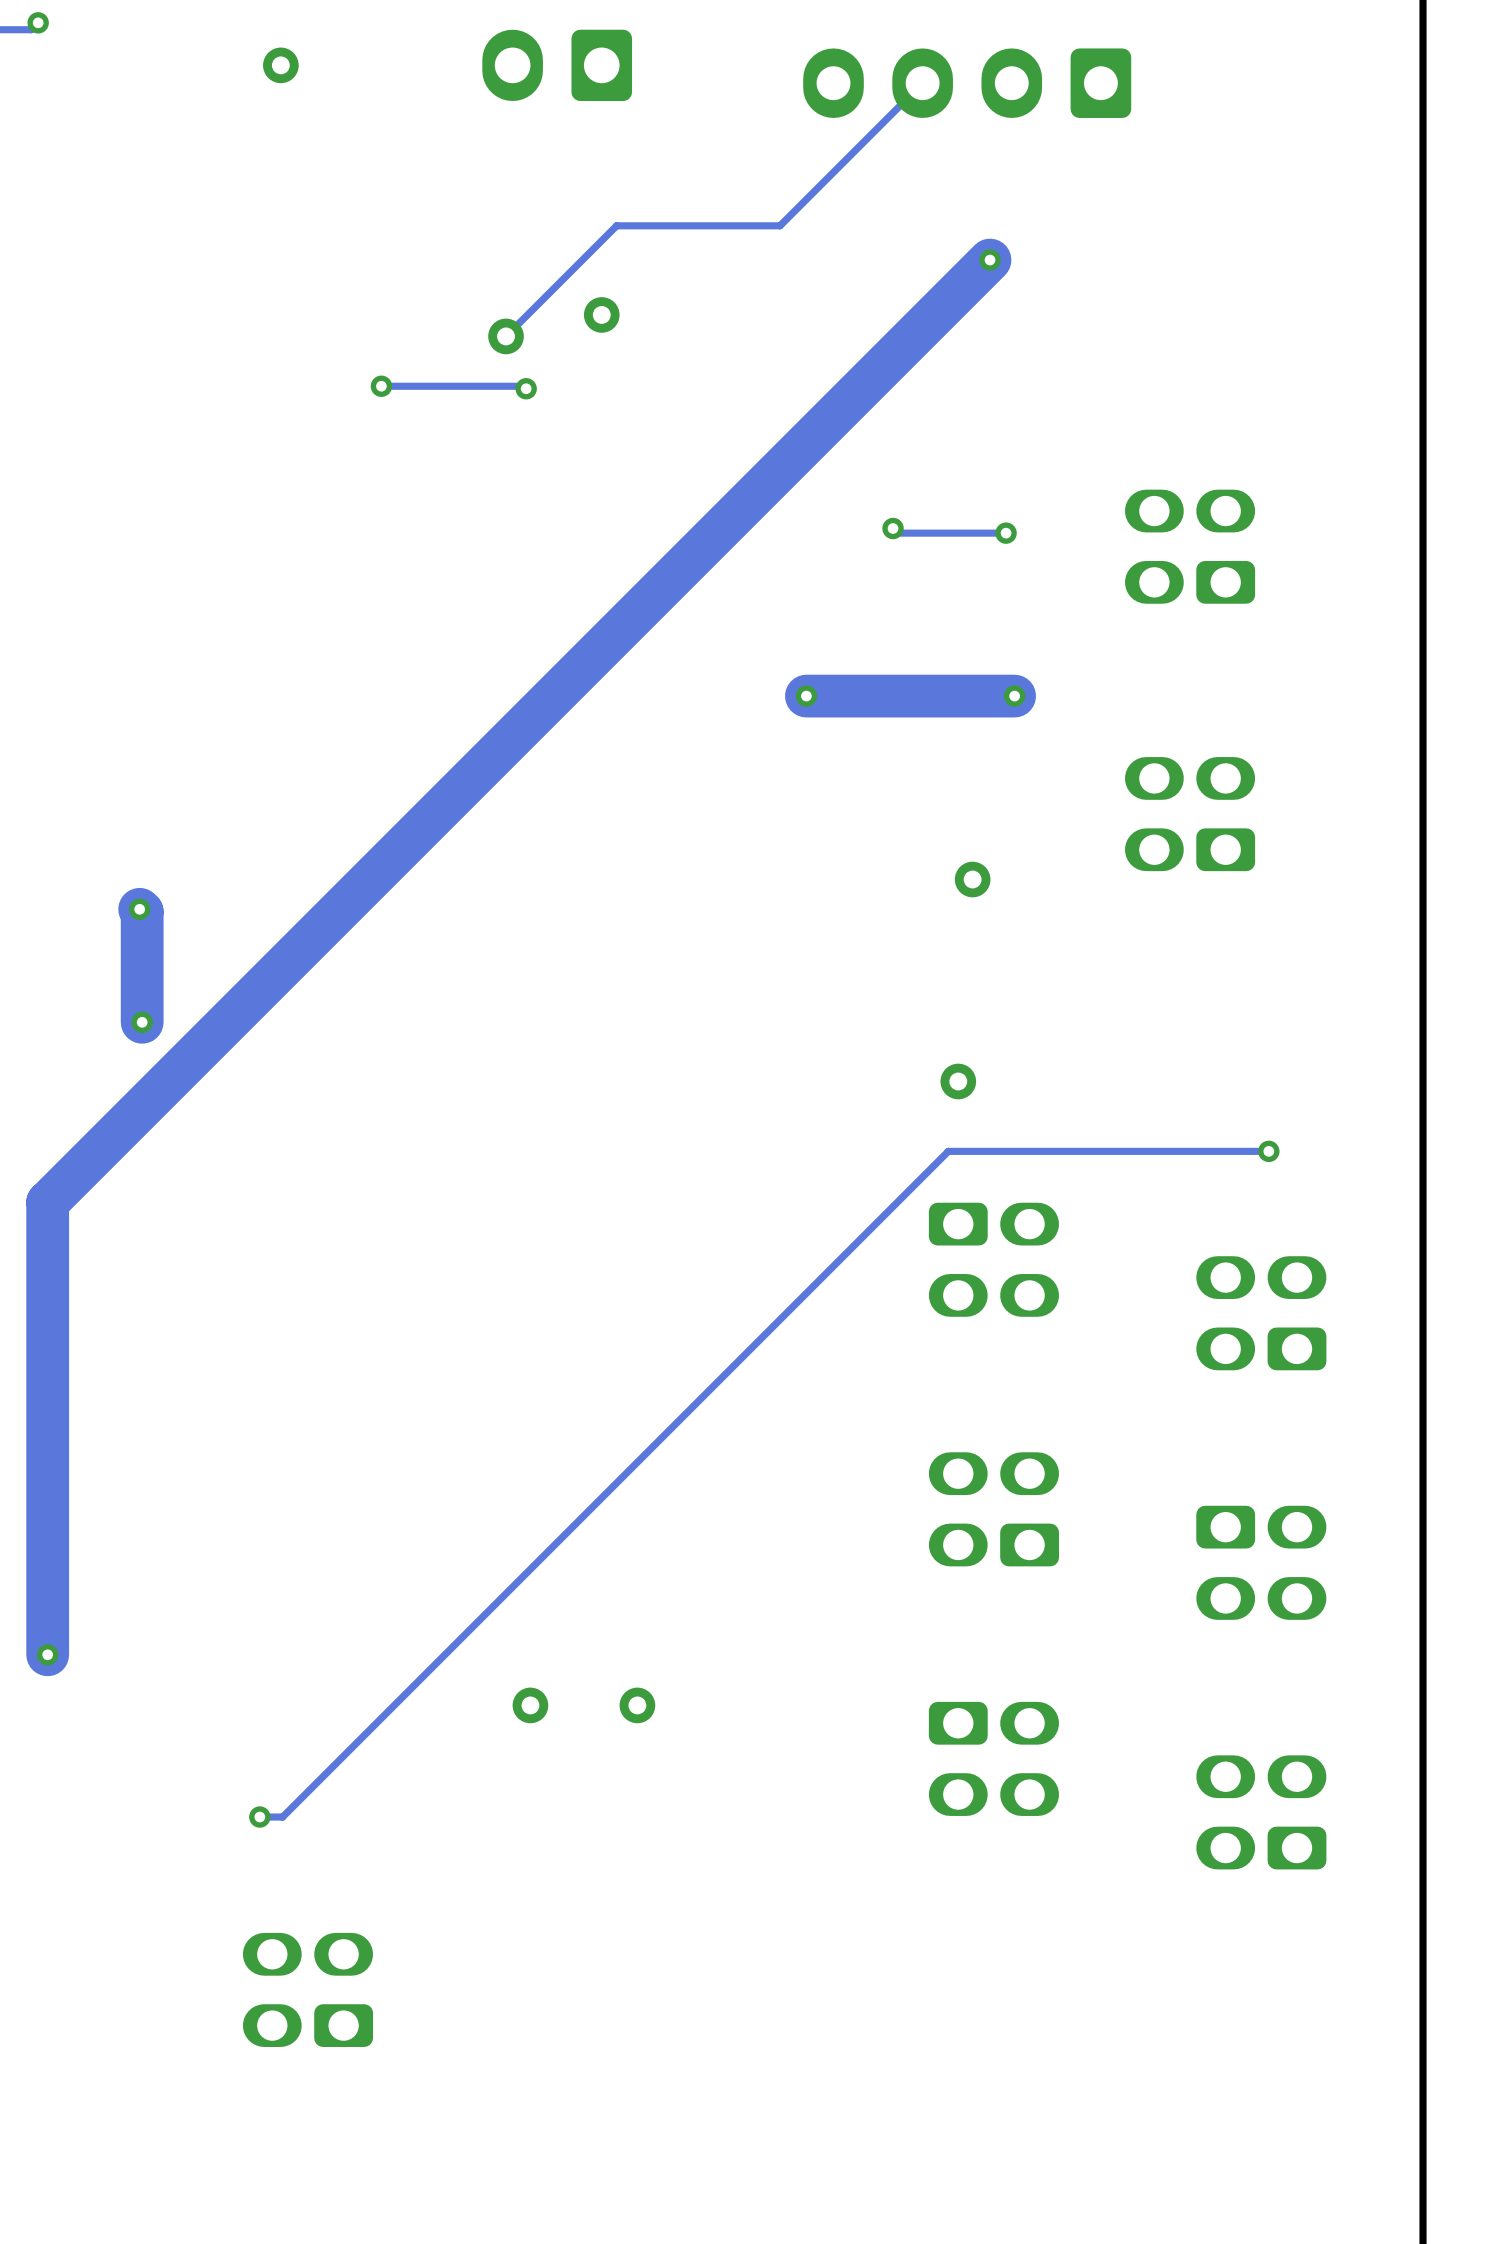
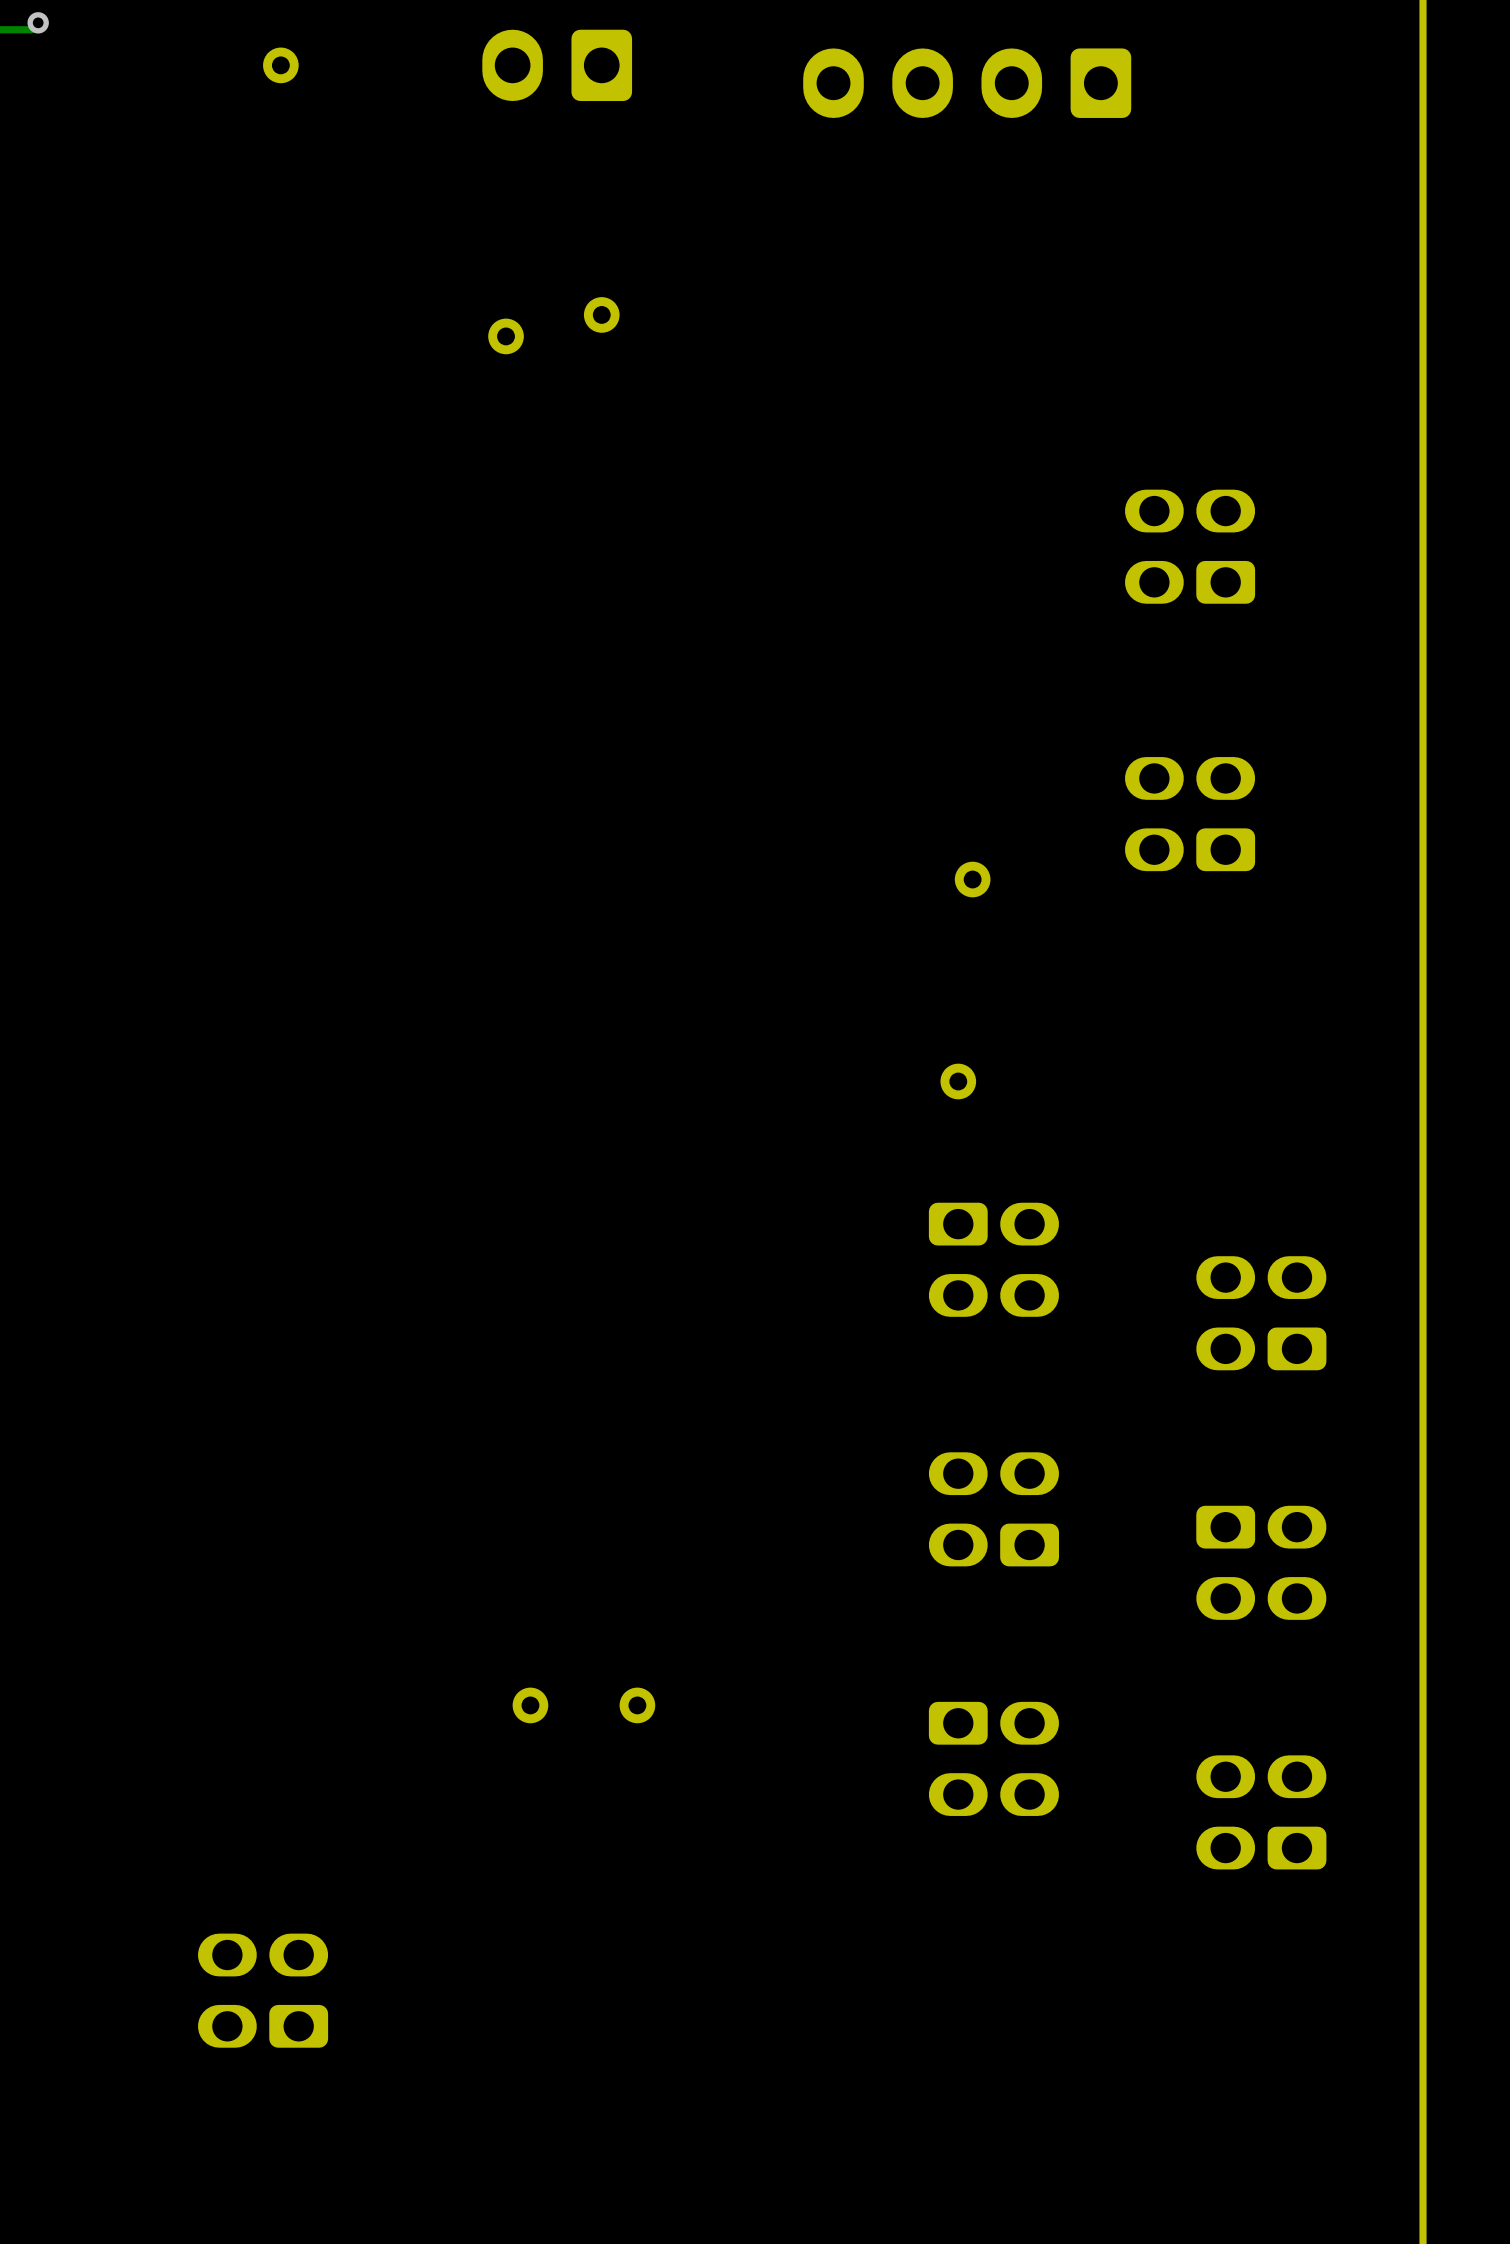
track: (922, 83) (780, 225) (616, 225) (506, 336) -> none
track: (990, 260) (47, 1202) (47, 1654) -> none
via: (990, 260) -> none
track: (381, 386) (523, 386) (526, 388) -> none
via: (381, 386) -> none
via: (526, 388) -> none
track: (893, 528) (895, 533) (1006, 532) -> none
via: (893, 528) -> none
via: (1006, 533) -> none
via: (806, 696) -> none
track: (1014, 696) (806, 696) -> none
via: (1014, 696) -> none
track: (139, 909) (142, 911) (142, 1022) -> none
via: (139, 909) -> none
via: (142, 1022) -> none
track: (1268, 1151) (948, 1151) (282, 1817) (259, 1817) -> none
via: (1268, 1151) -> none
via: (47, 1654) -> none
via: (259, 1817) -> none
part position: (307, 1989) -> (263, 1990)

